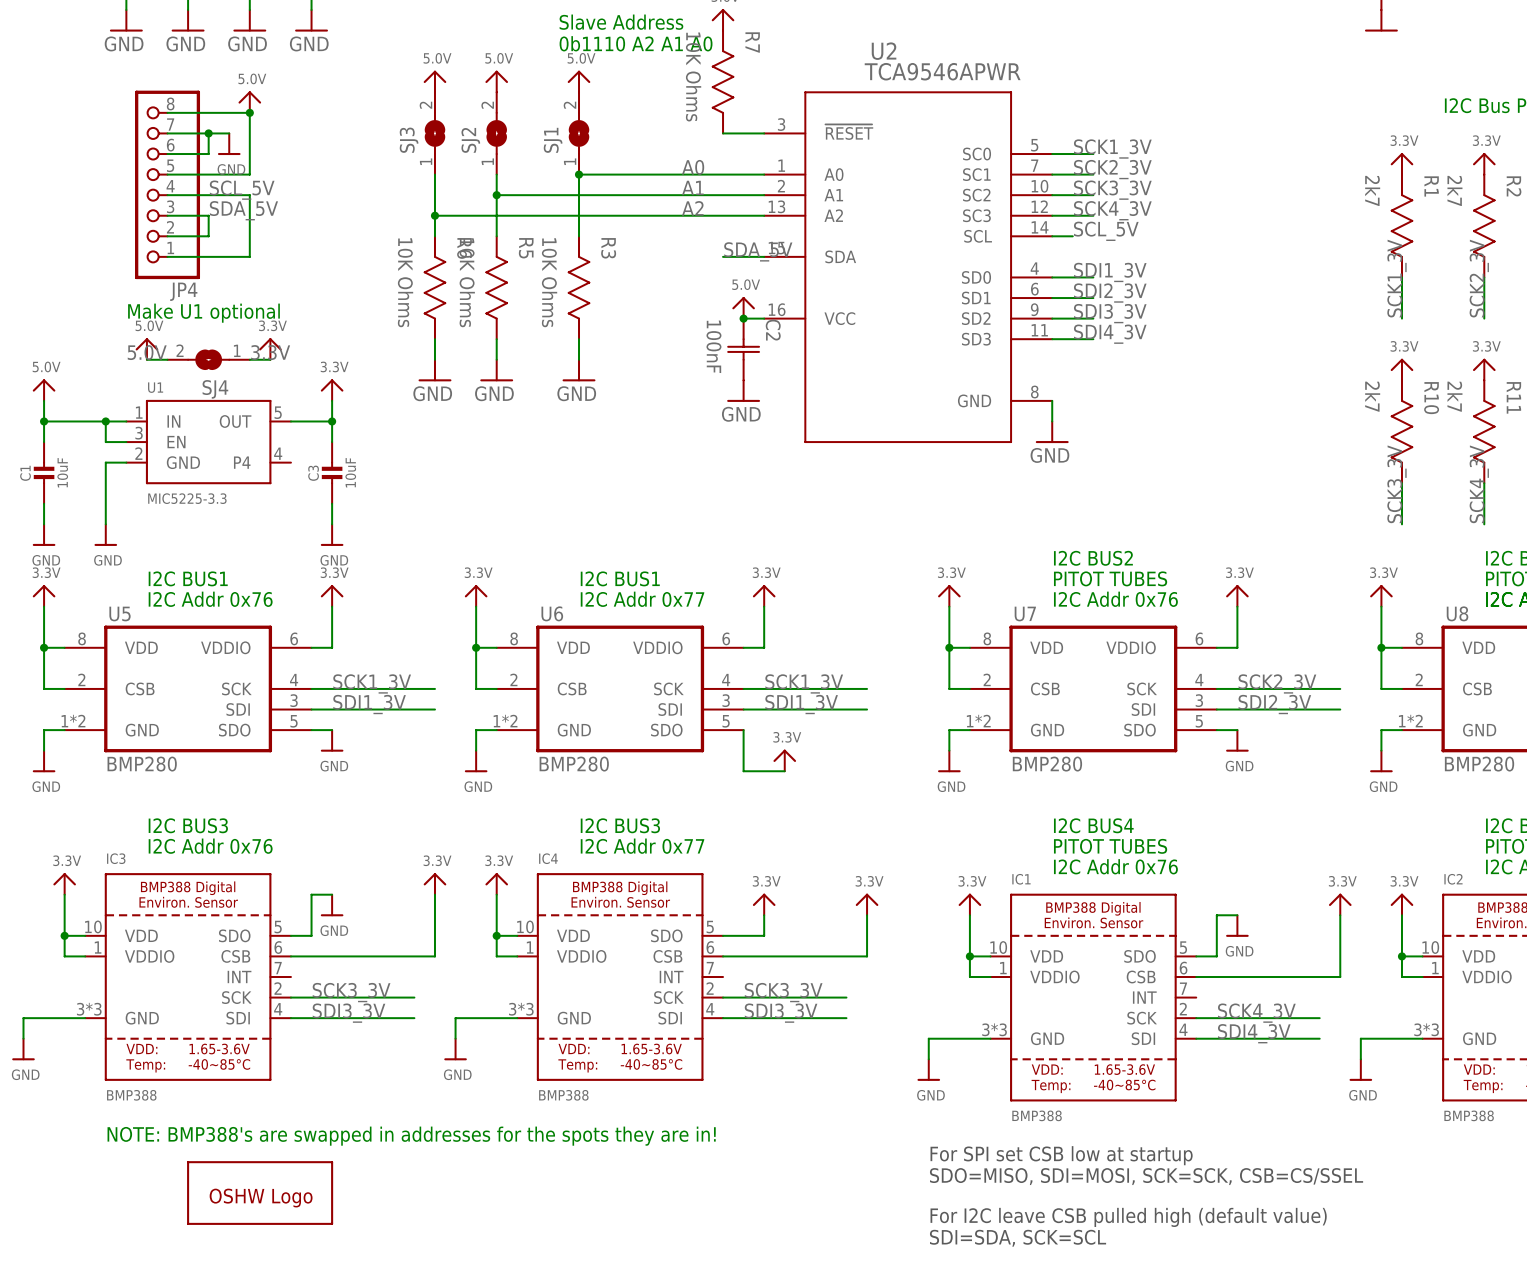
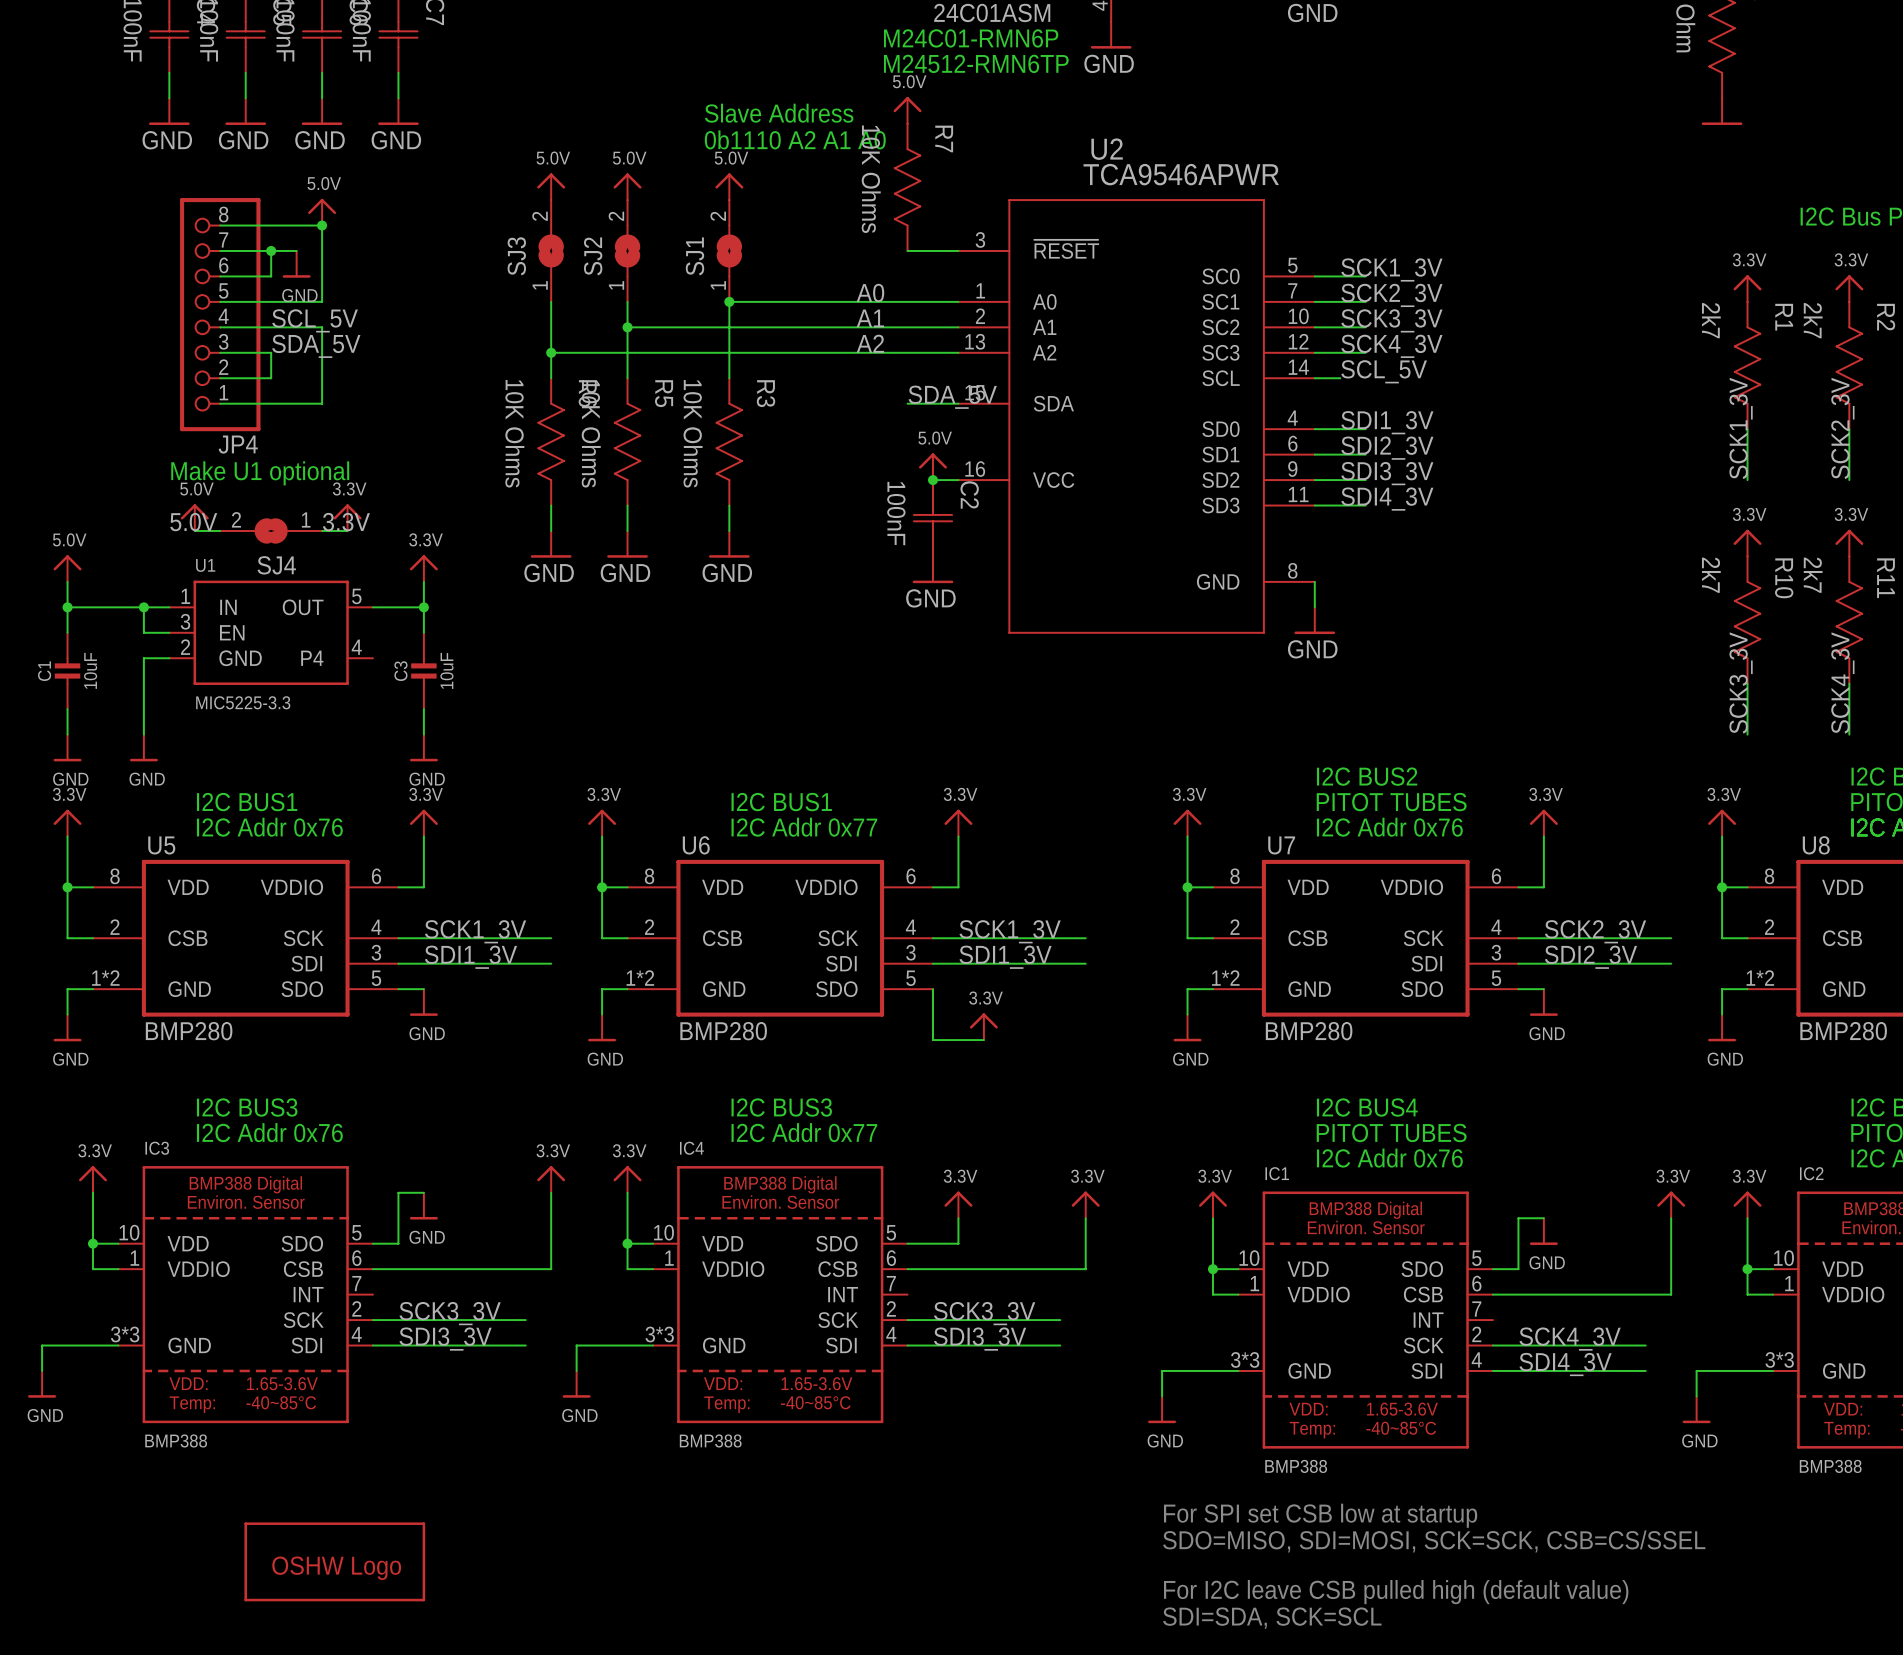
text: NOTE: BMP388's are swapped in addresses for the spots they are in! (411, 1136) -> none

